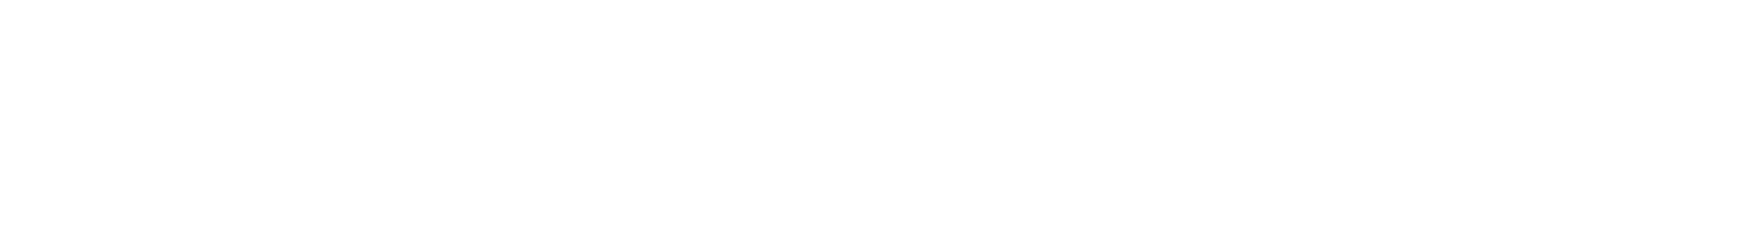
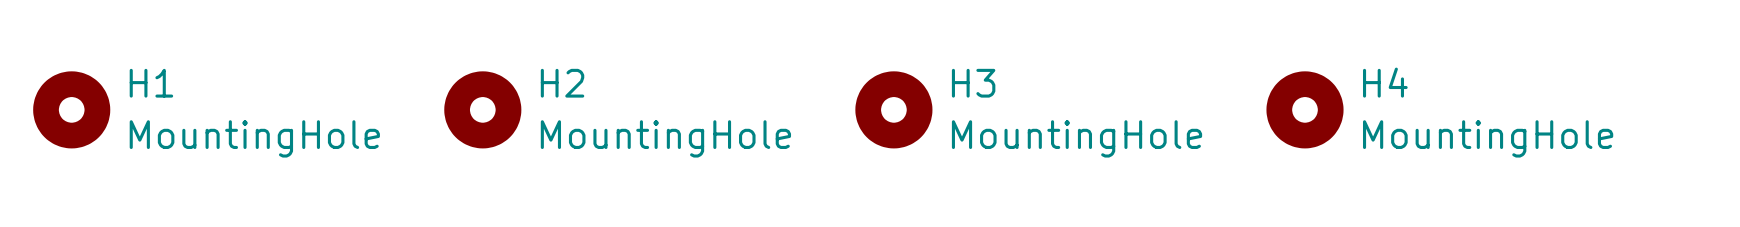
H1: none -> MountingHole (71, 109)
H2: none -> MountingHole (482, 109)
H3: none -> MountingHole (893, 109)
H4: none -> MountingHole (1305, 109)

